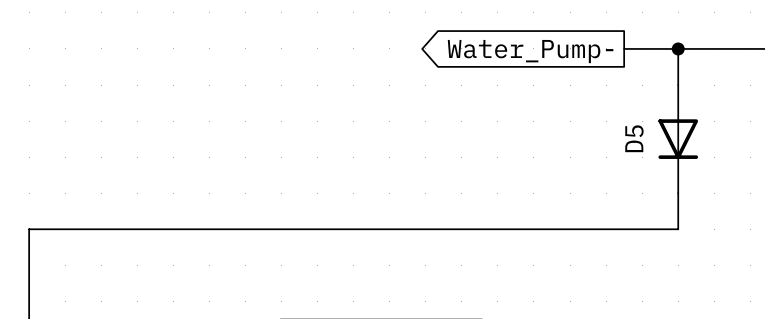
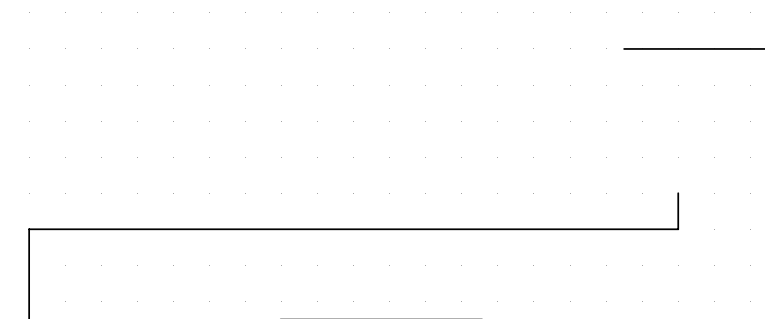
wire: (678, 48) (678, 85) -> none
junction: (678, 48) -> none
global label: Water_Pump- (530, 51) -> none
D5: (678, 139) -> none

